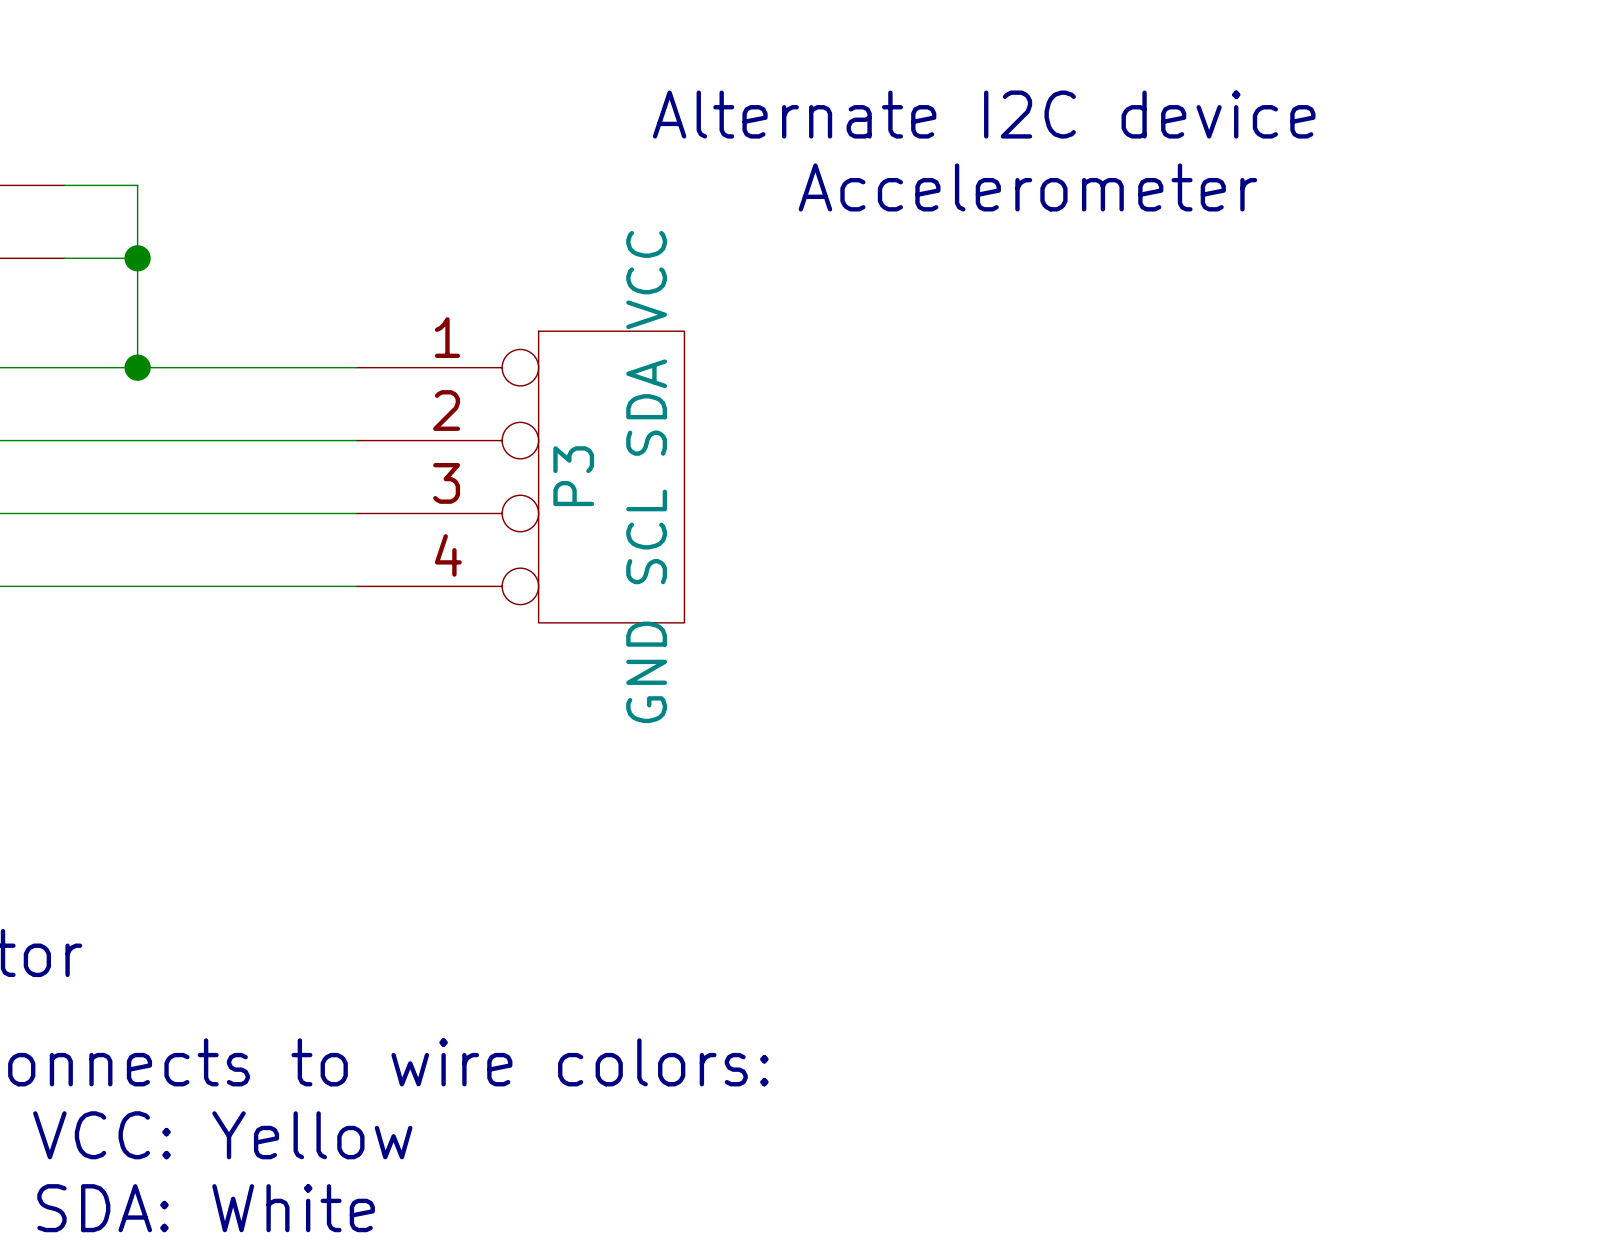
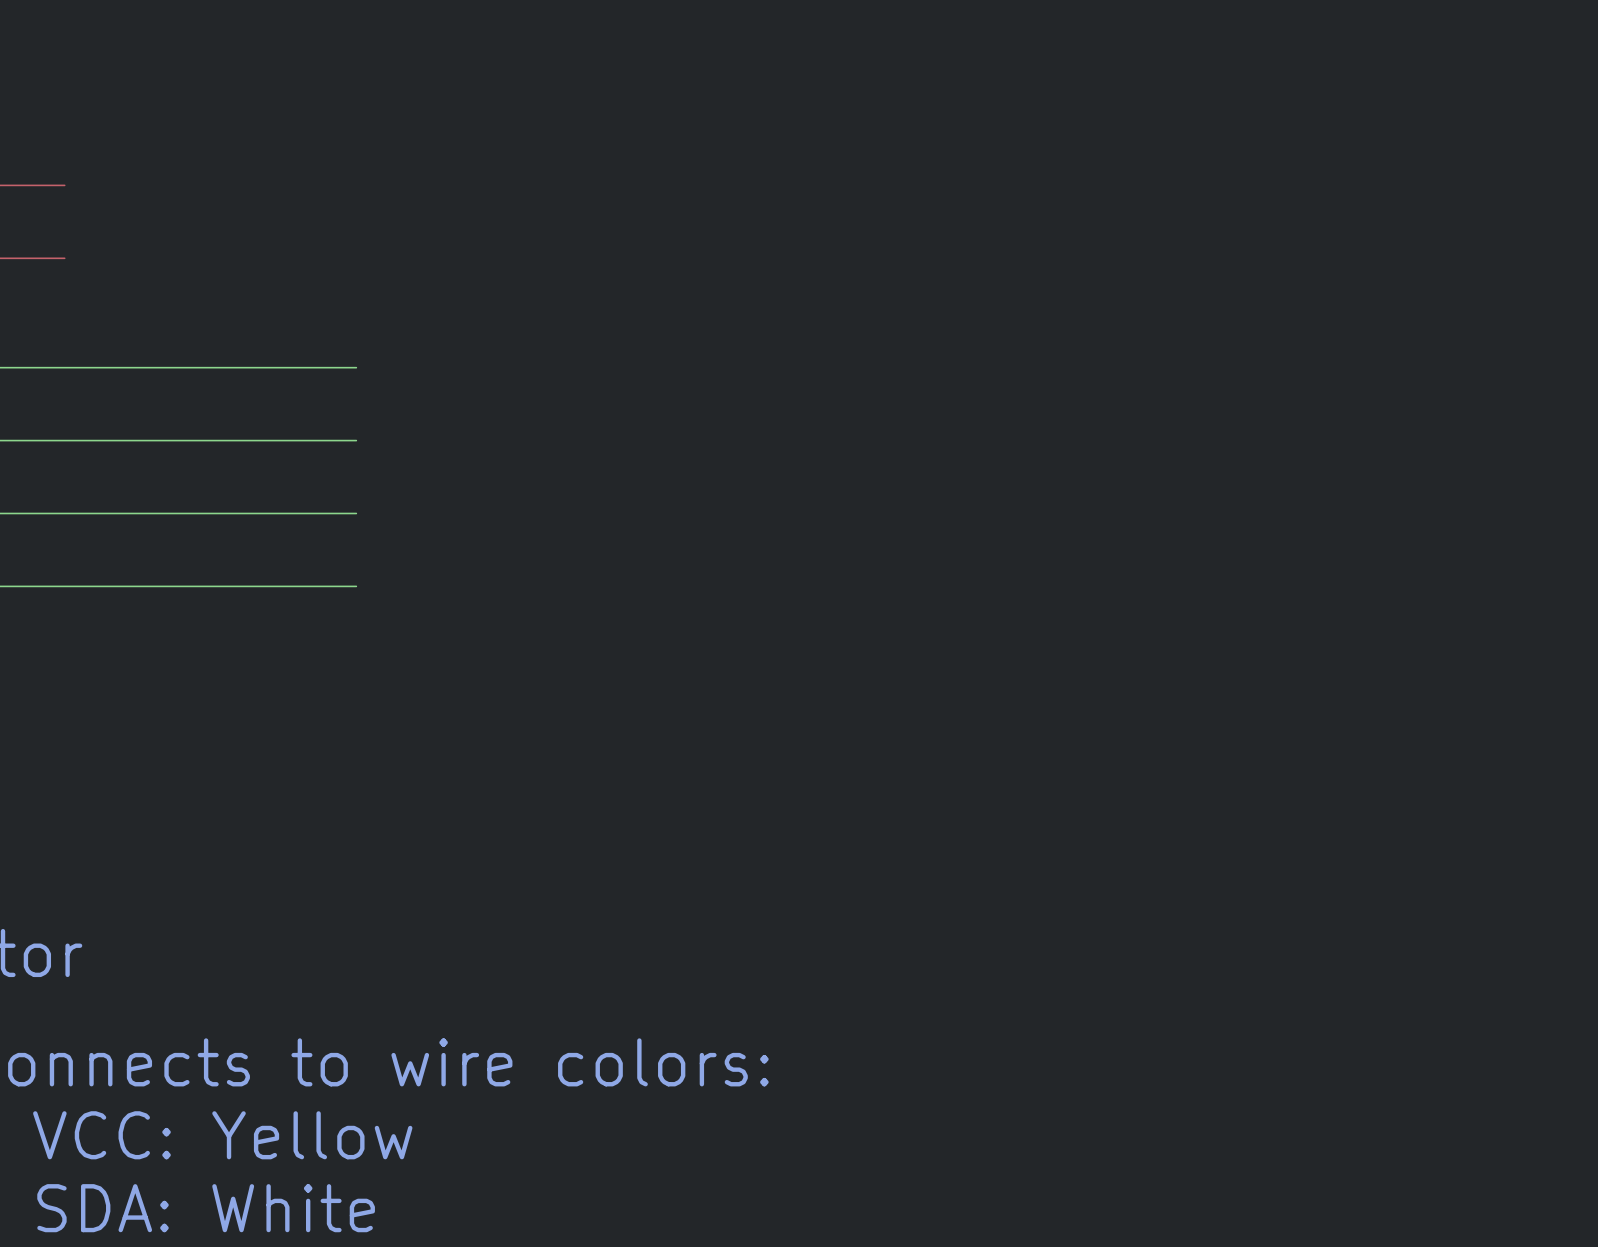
text: Alternate I2C device (984, 114) -> none
wire: (64, 185) (137, 185) (137, 367) -> none
text: Accelerometer (1027, 187) -> none
wire: (64, 258) (137, 258) -> none
junction: (137, 258) -> none
junction: (137, 367) -> none
P3: GND SCL SDA VCC (520, 477) -> none

